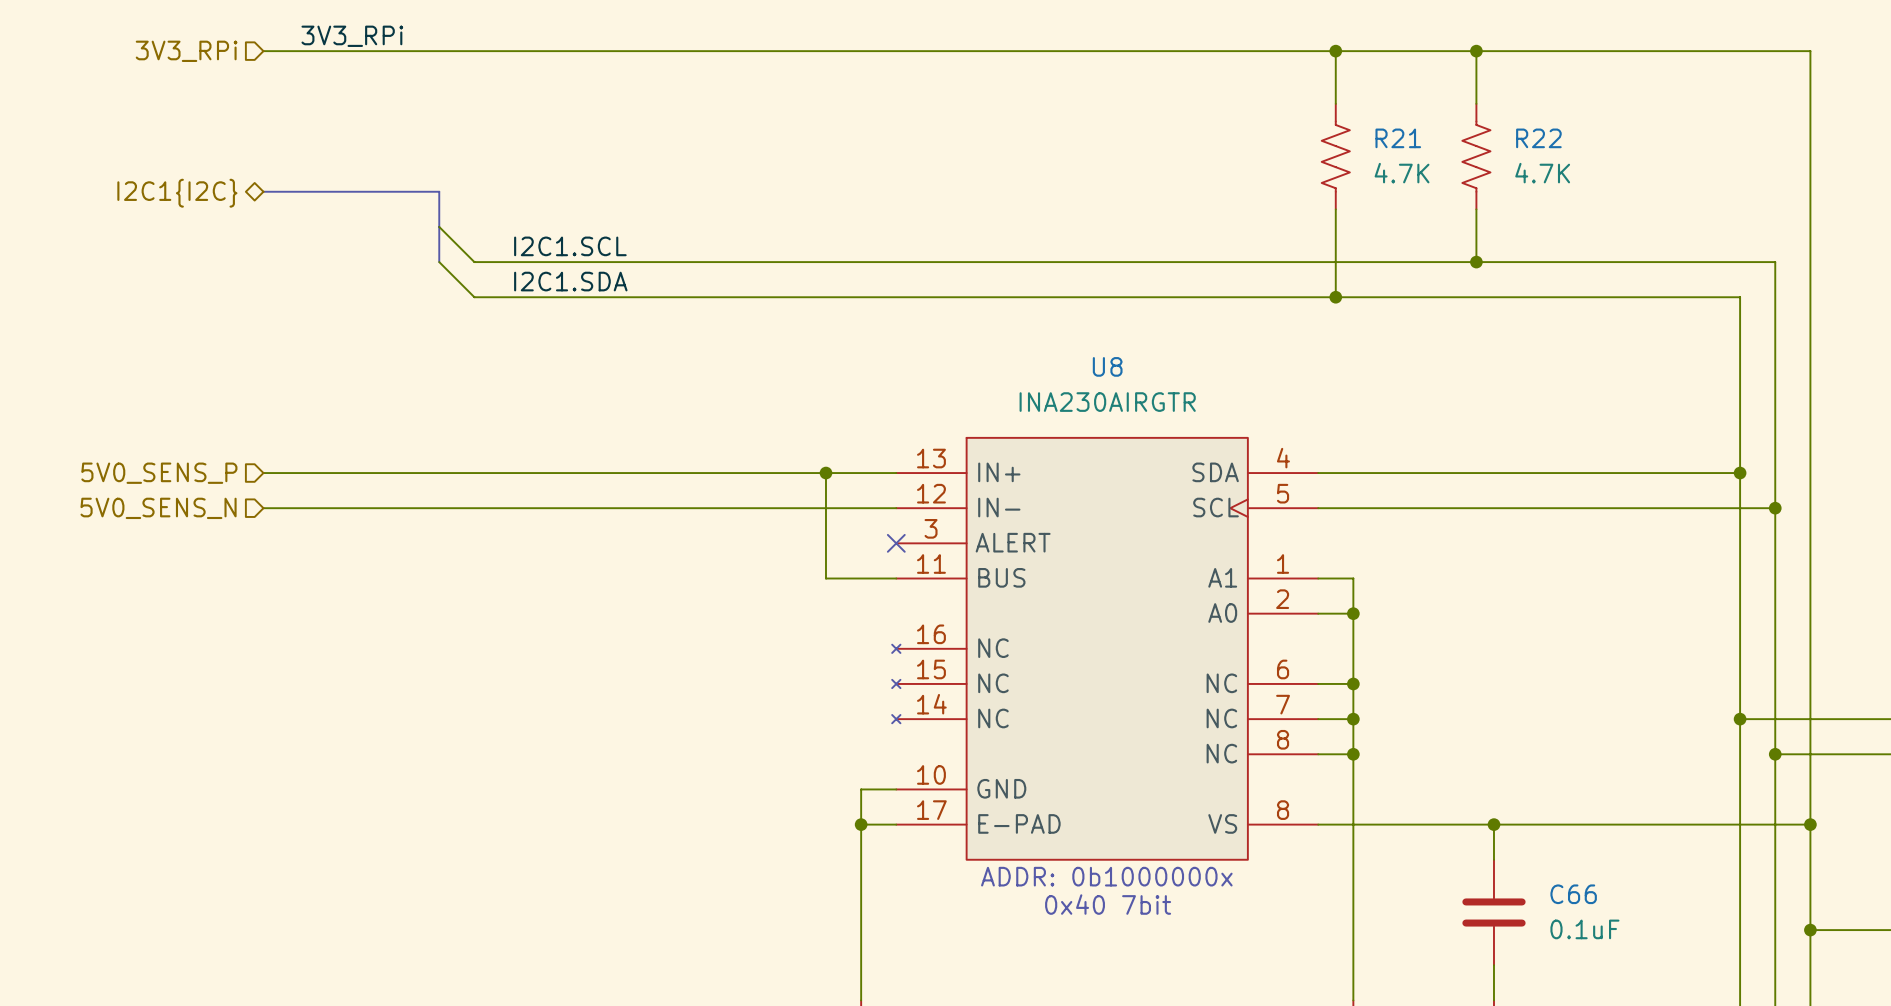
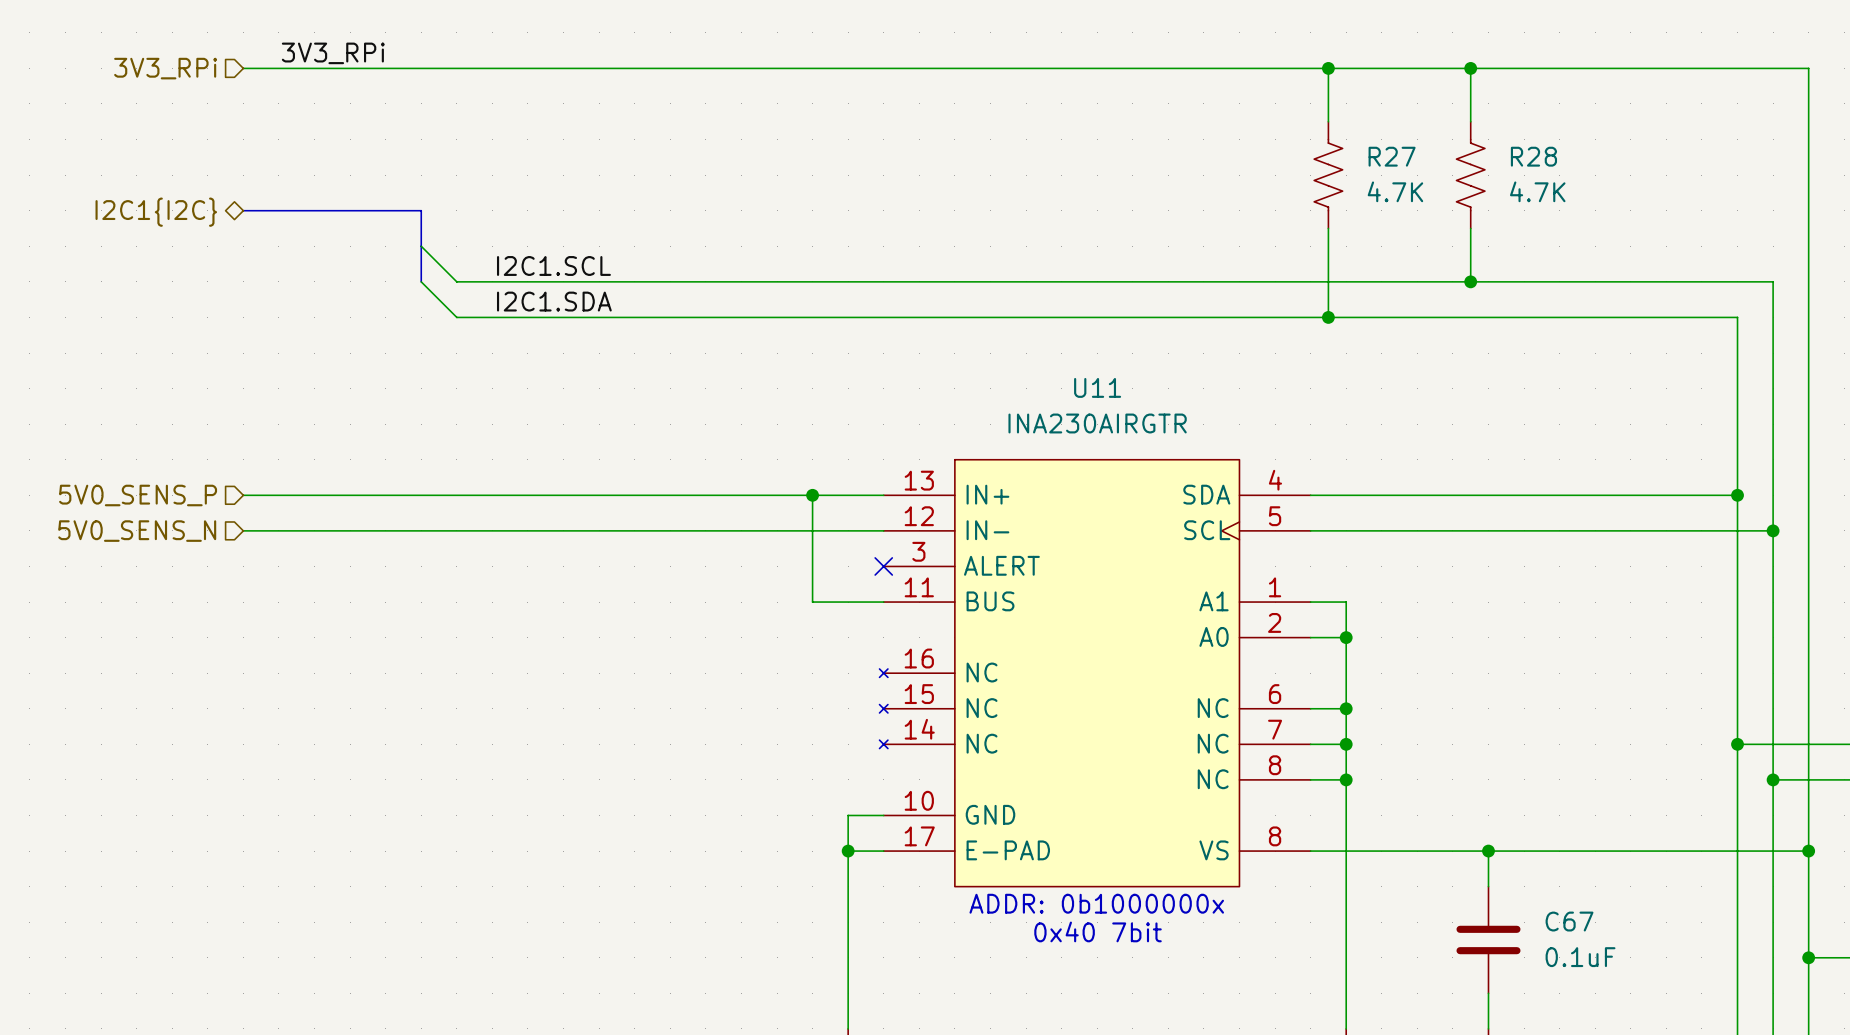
R21 name: R21 (1398, 138) -> R27 (1392, 156)
R22 name: R22 (1538, 138) -> R28 (1533, 156)
U8 name: U8 (1107, 366) -> U11 (1097, 387)
C66 name: C66 (1573, 894) -> C67 (1569, 921)

